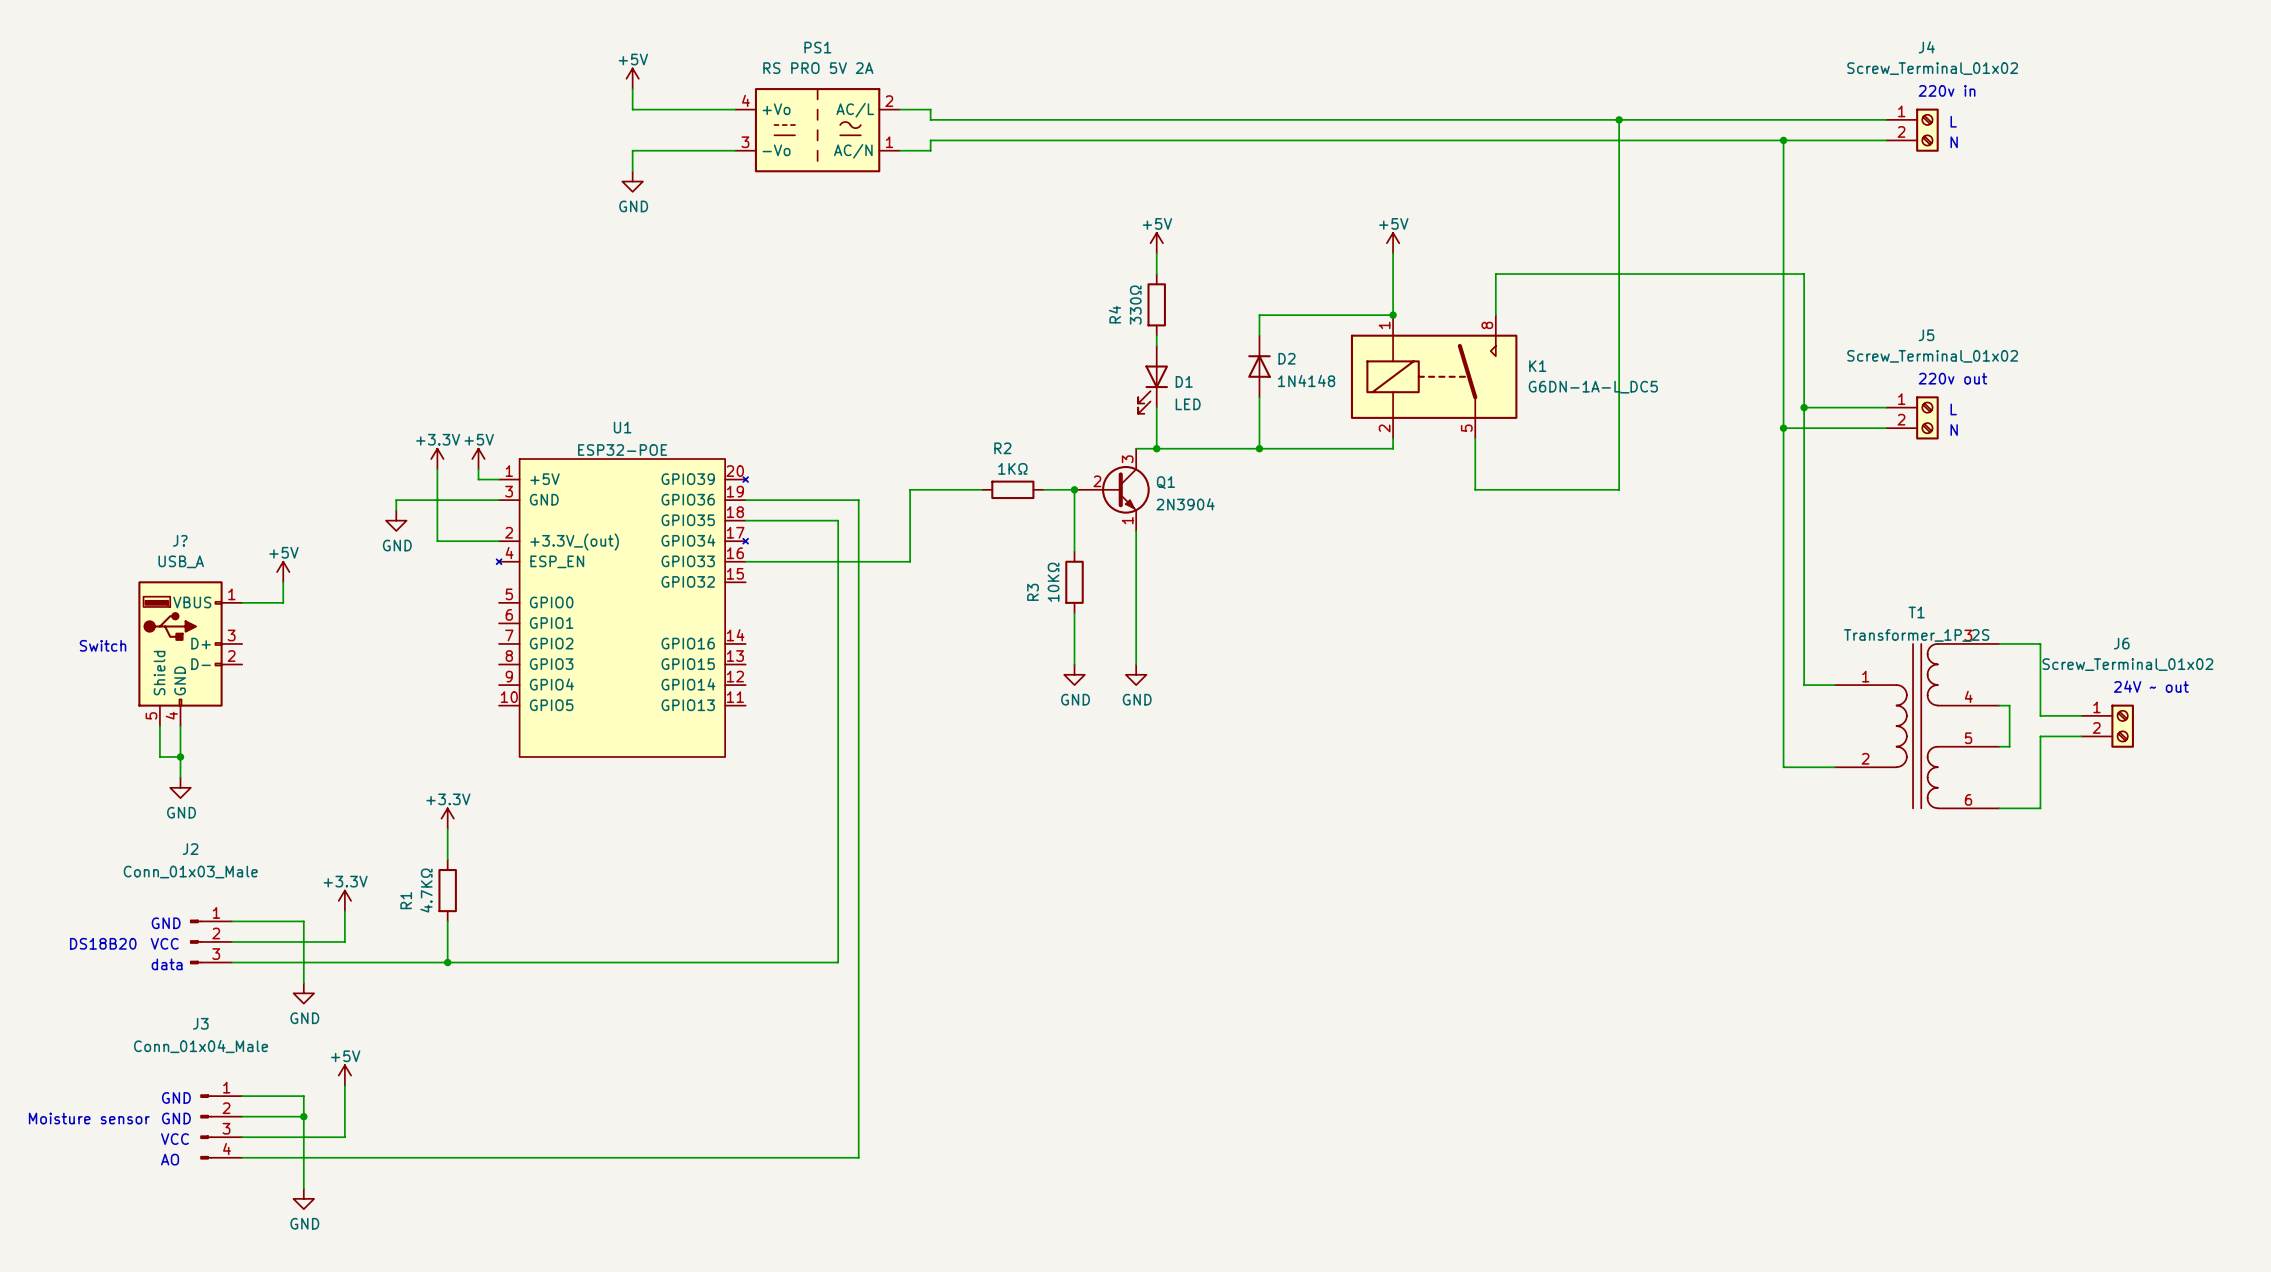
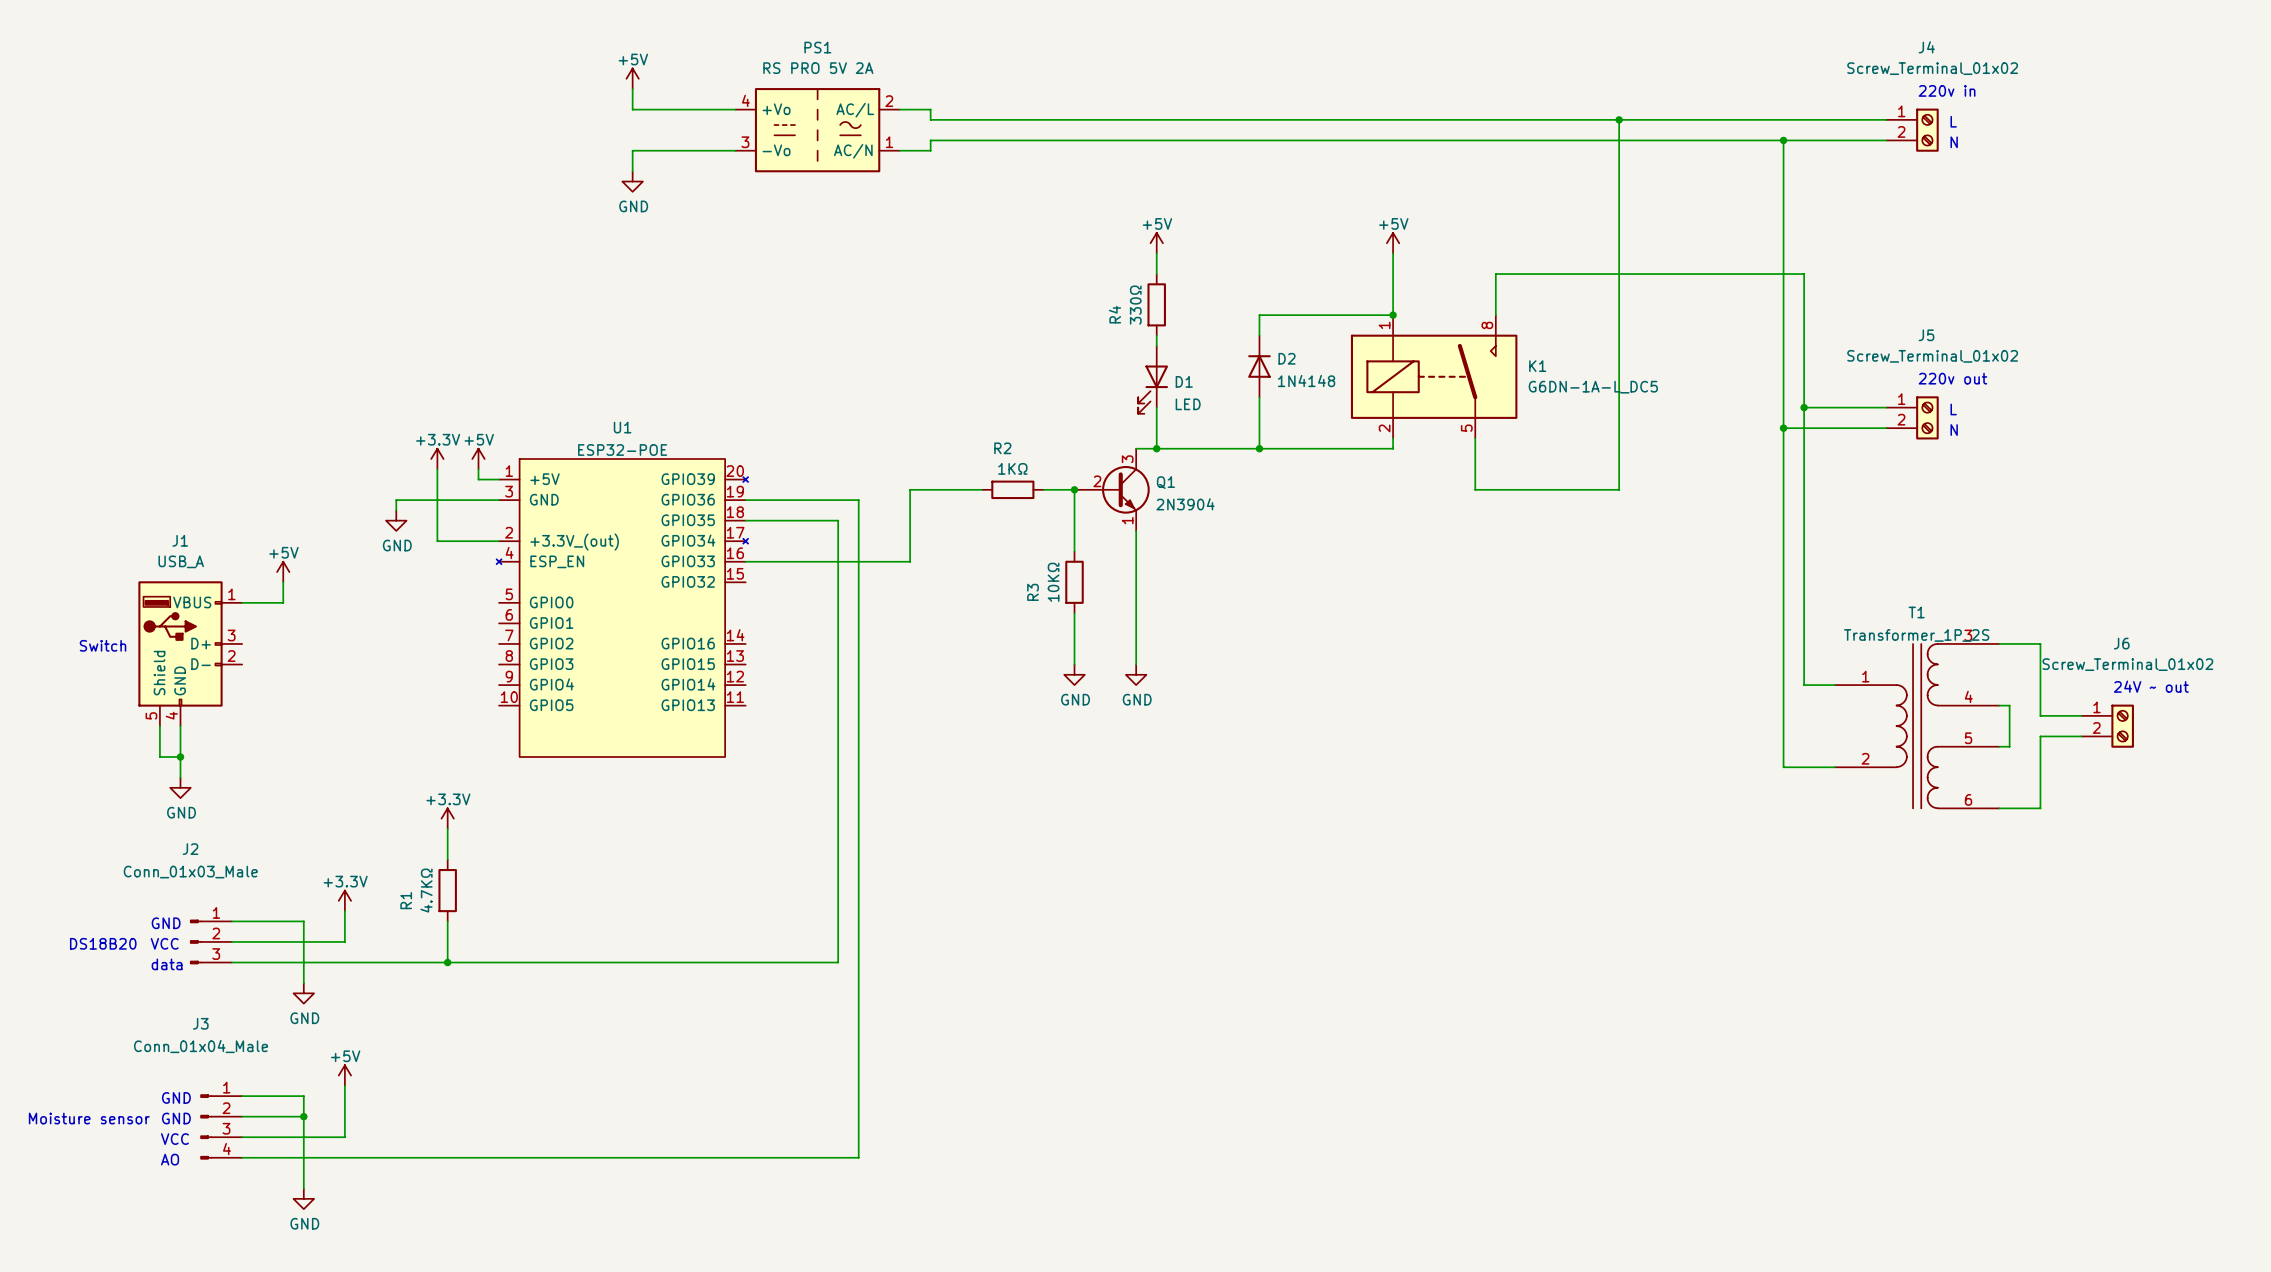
J? name: J? (180, 540) -> J1 (180, 540)

